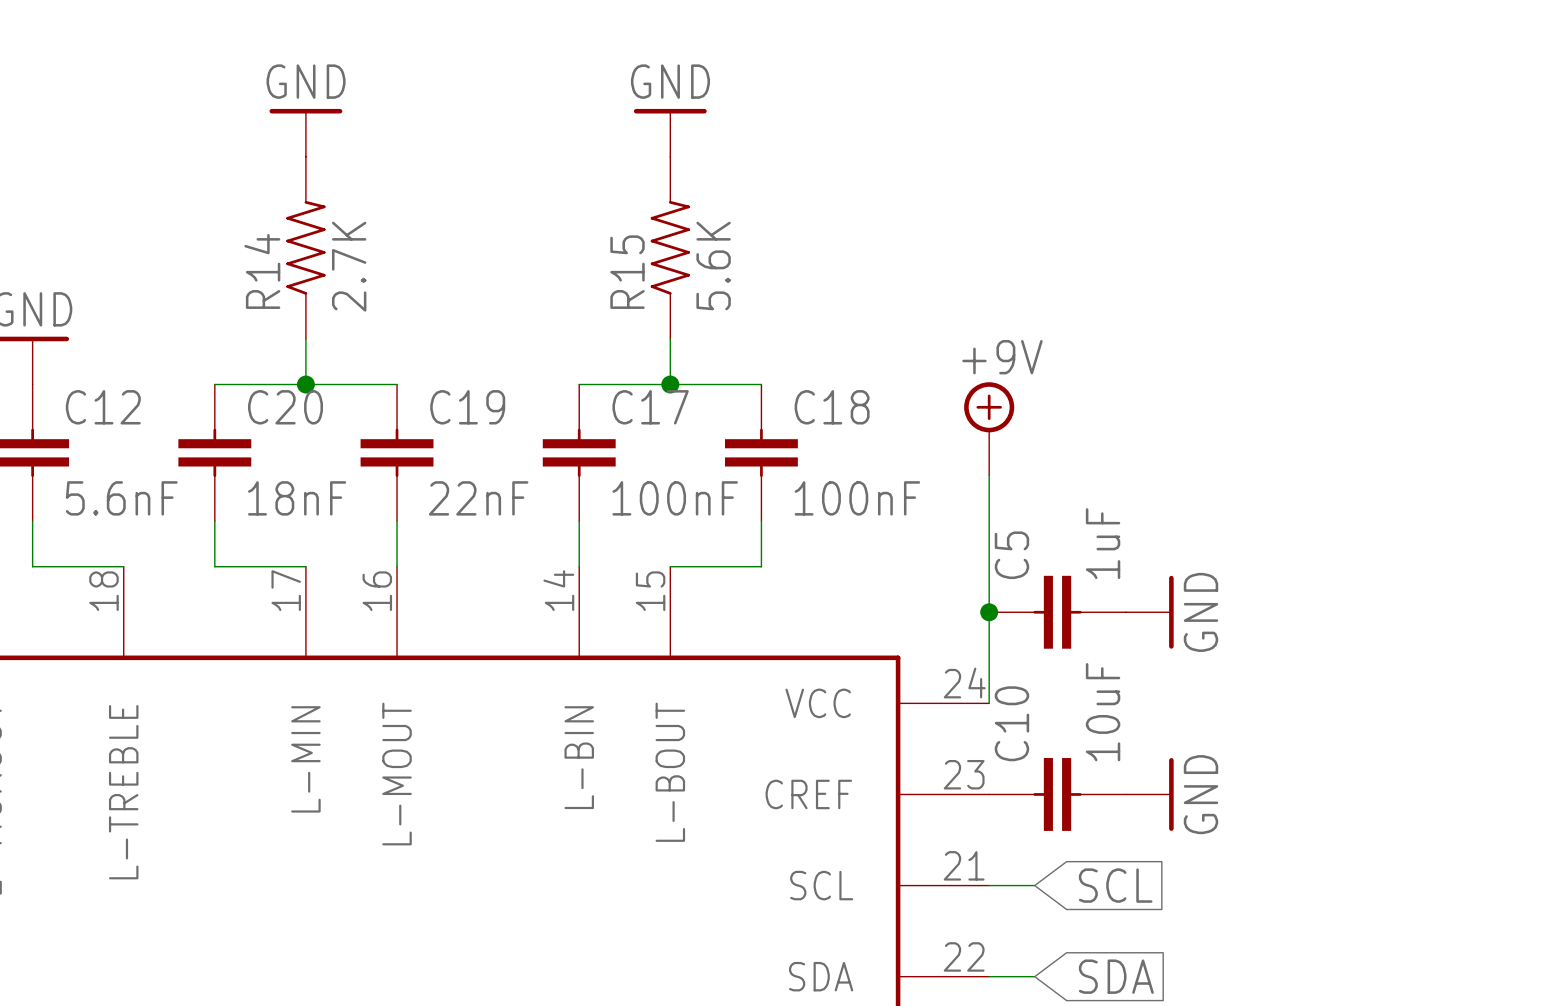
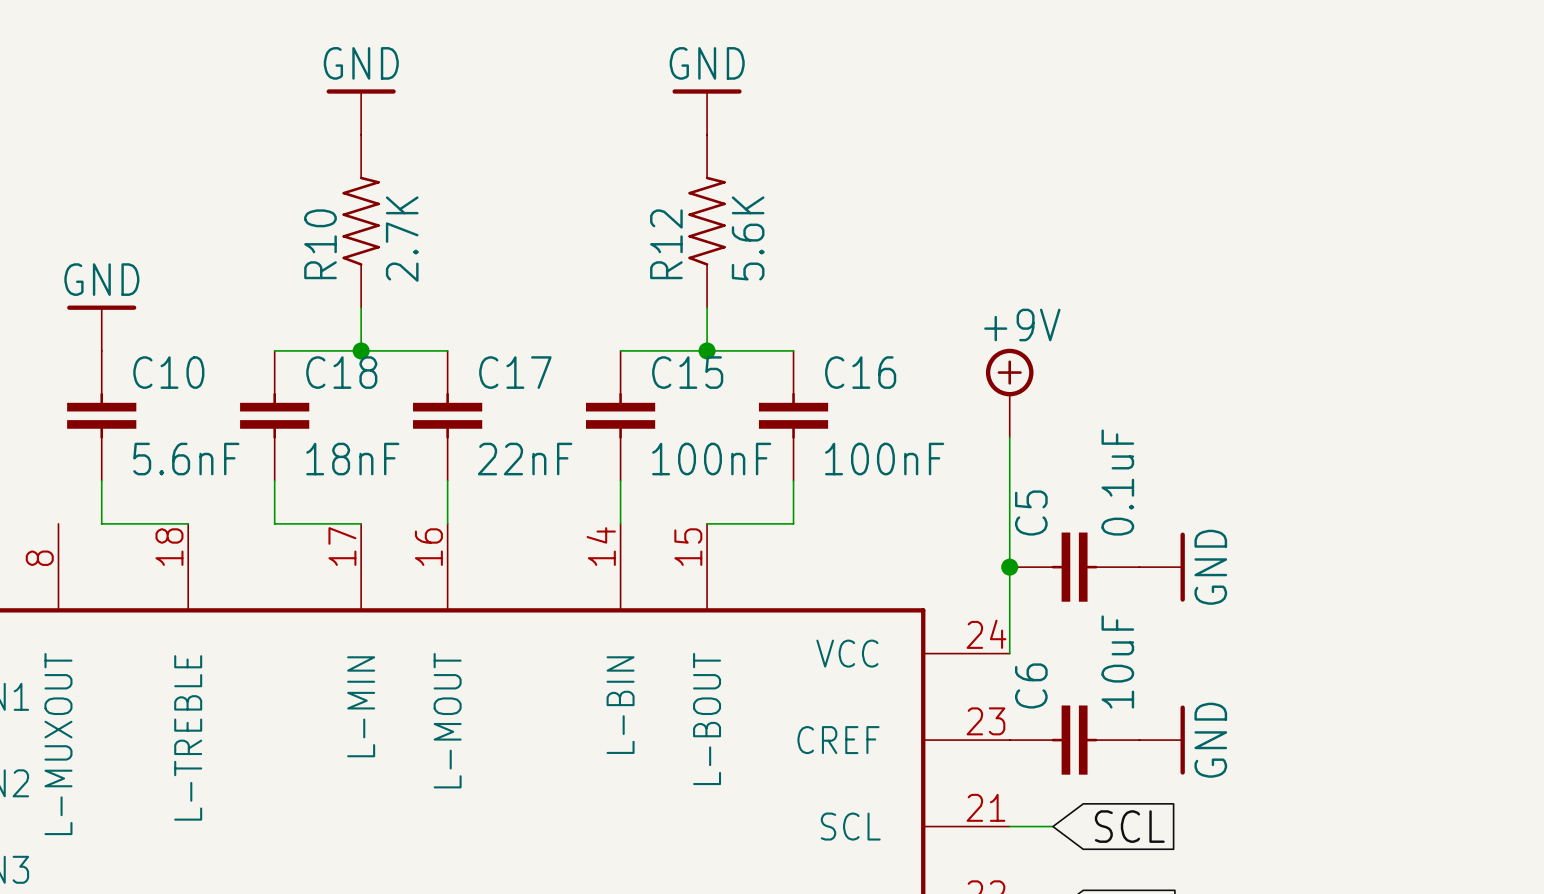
R14 name: R14 (262, 271) -> R10 (320, 244)
R15 name: R15 (627, 272) -> R12 (666, 244)
C12 name: C12 (103, 407) -> C10 (168, 372)
C20 name: C20 (285, 407) -> C18 (341, 372)
C19 name: C19 (467, 407) -> C17 (515, 372)
C17 name: C17 (650, 407) -> C15 (687, 372)
C18 name: C18 (832, 407) -> C16 (860, 372)
C5 value: 1uF (1103, 543) -> 0.1uF (1117, 482)
C10 name: C10 (1011, 723) -> C6 (1031, 685)

